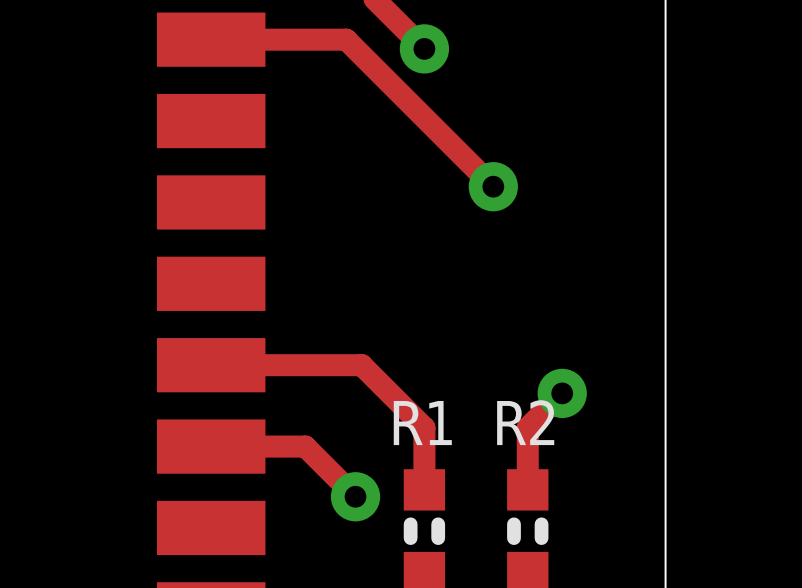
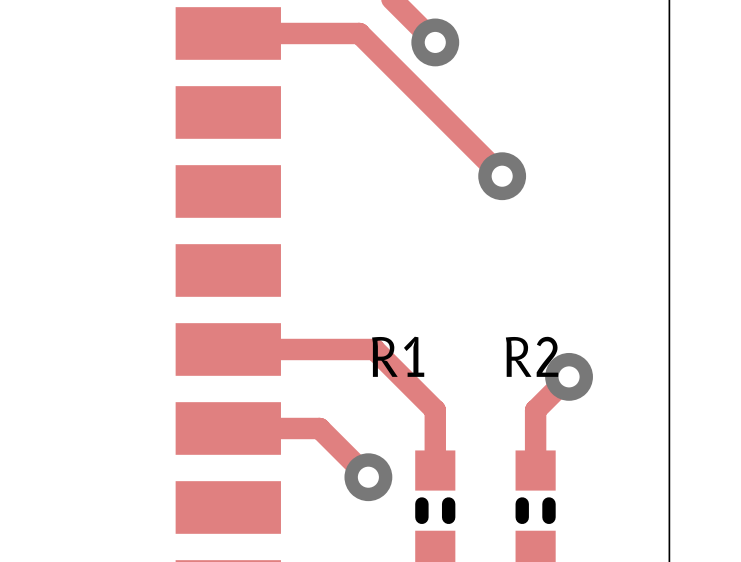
R2 name position: R2 (525, 422) -> R2 (532, 356)
R1 name position: R1 (422, 423) -> R1 (398, 356)

